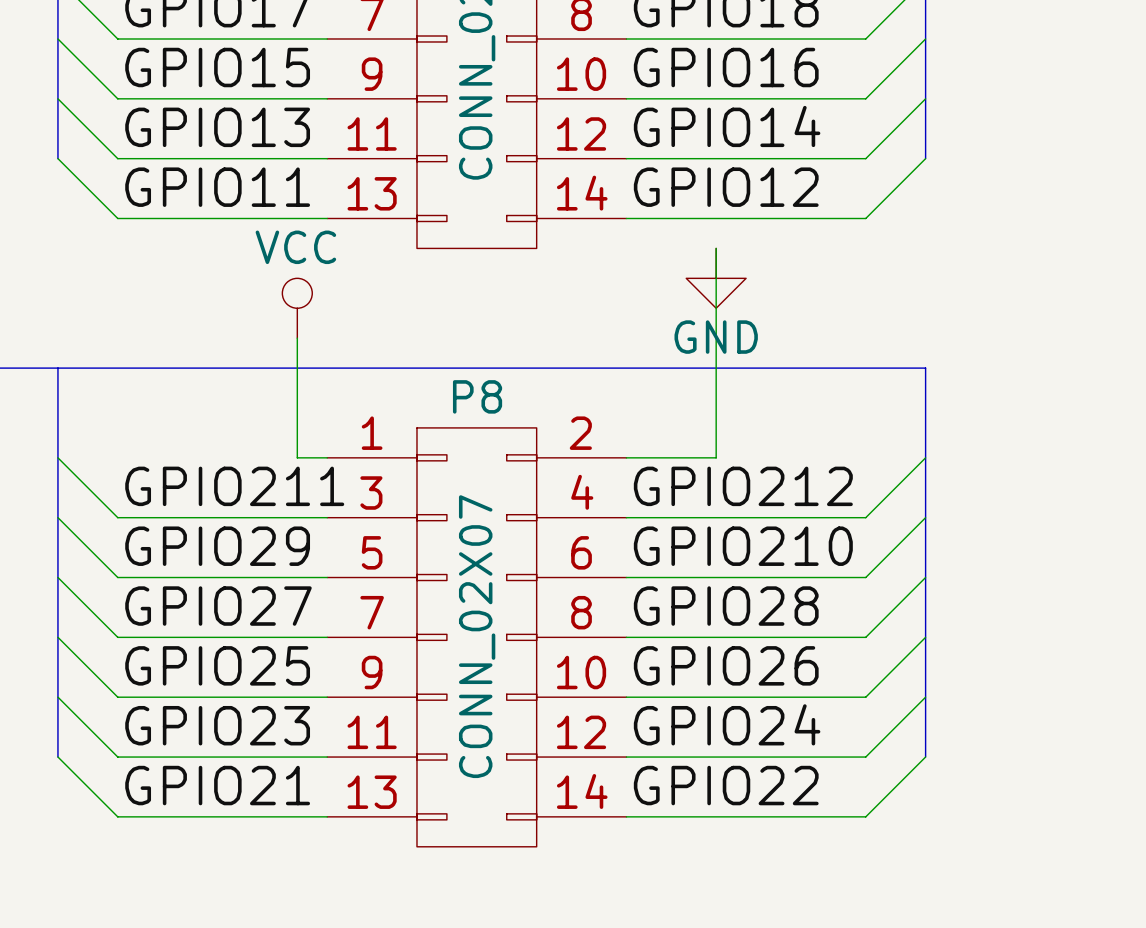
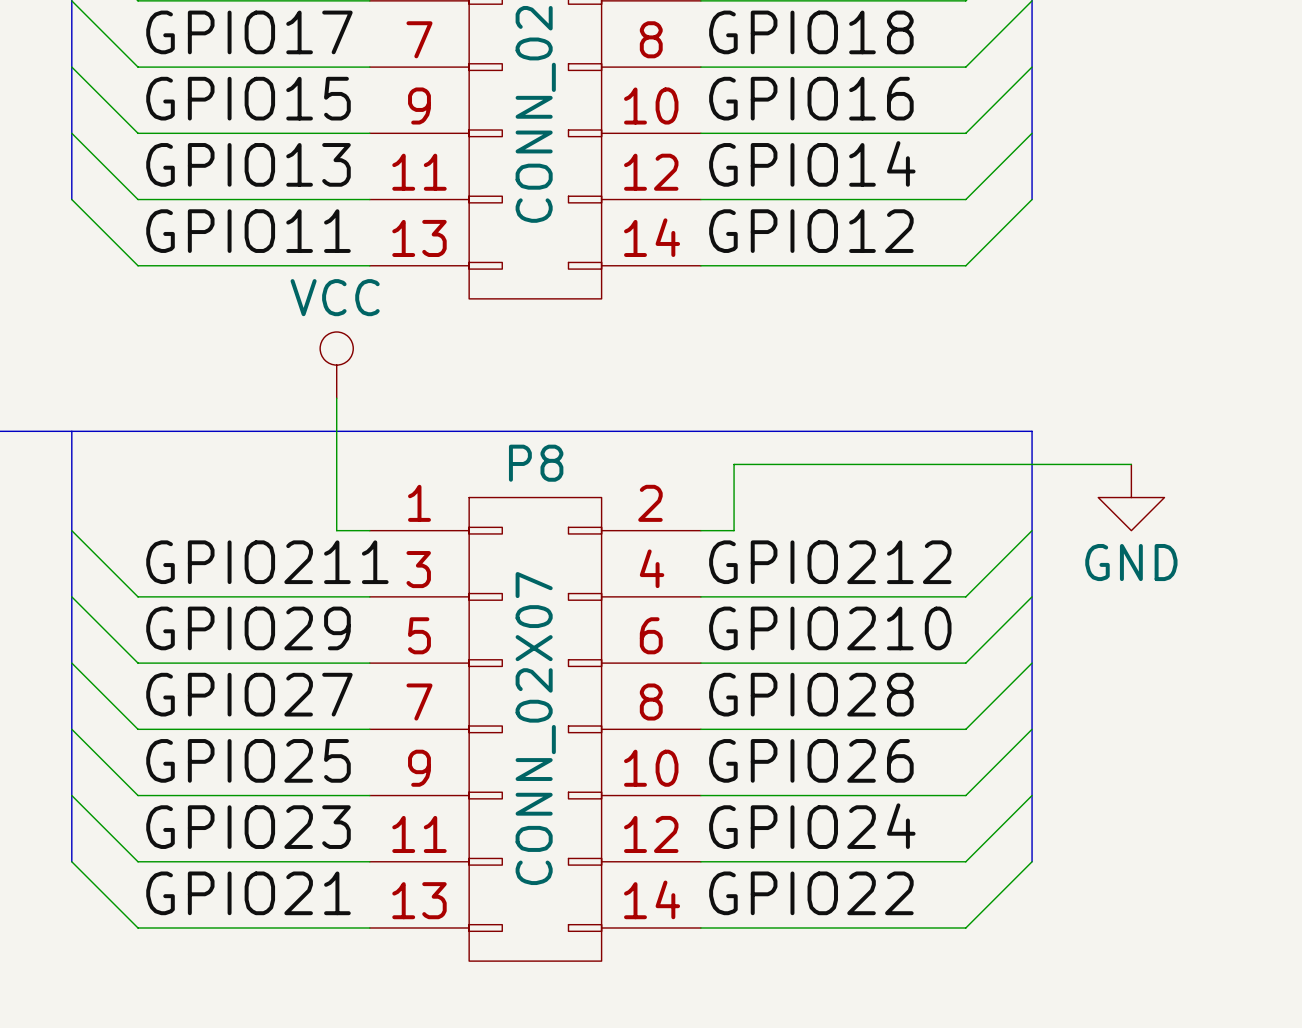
wire: (716, 248) (716, 457) (656, 457) -> (1131, 464) (734, 464) (734, 530)
power symbol position: GND (716, 278) -> GND (1131, 497)

